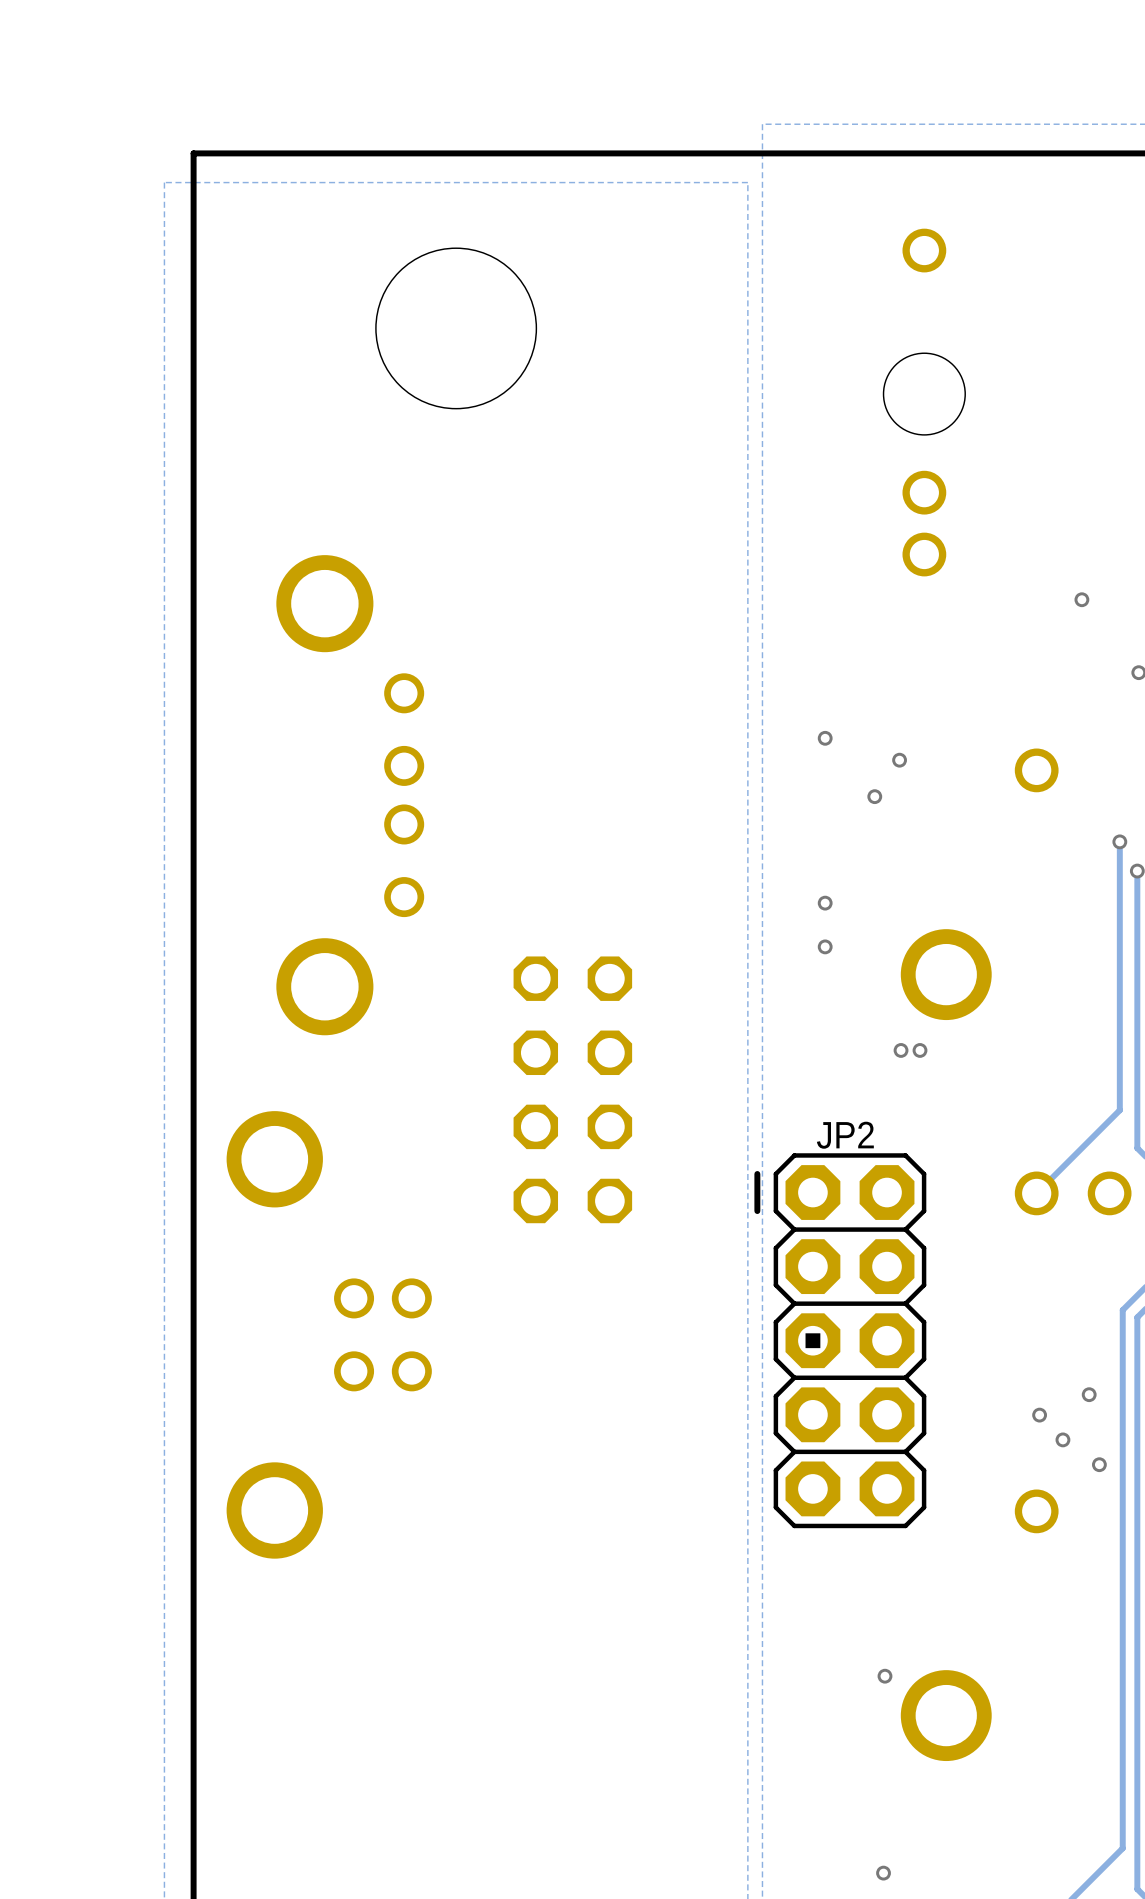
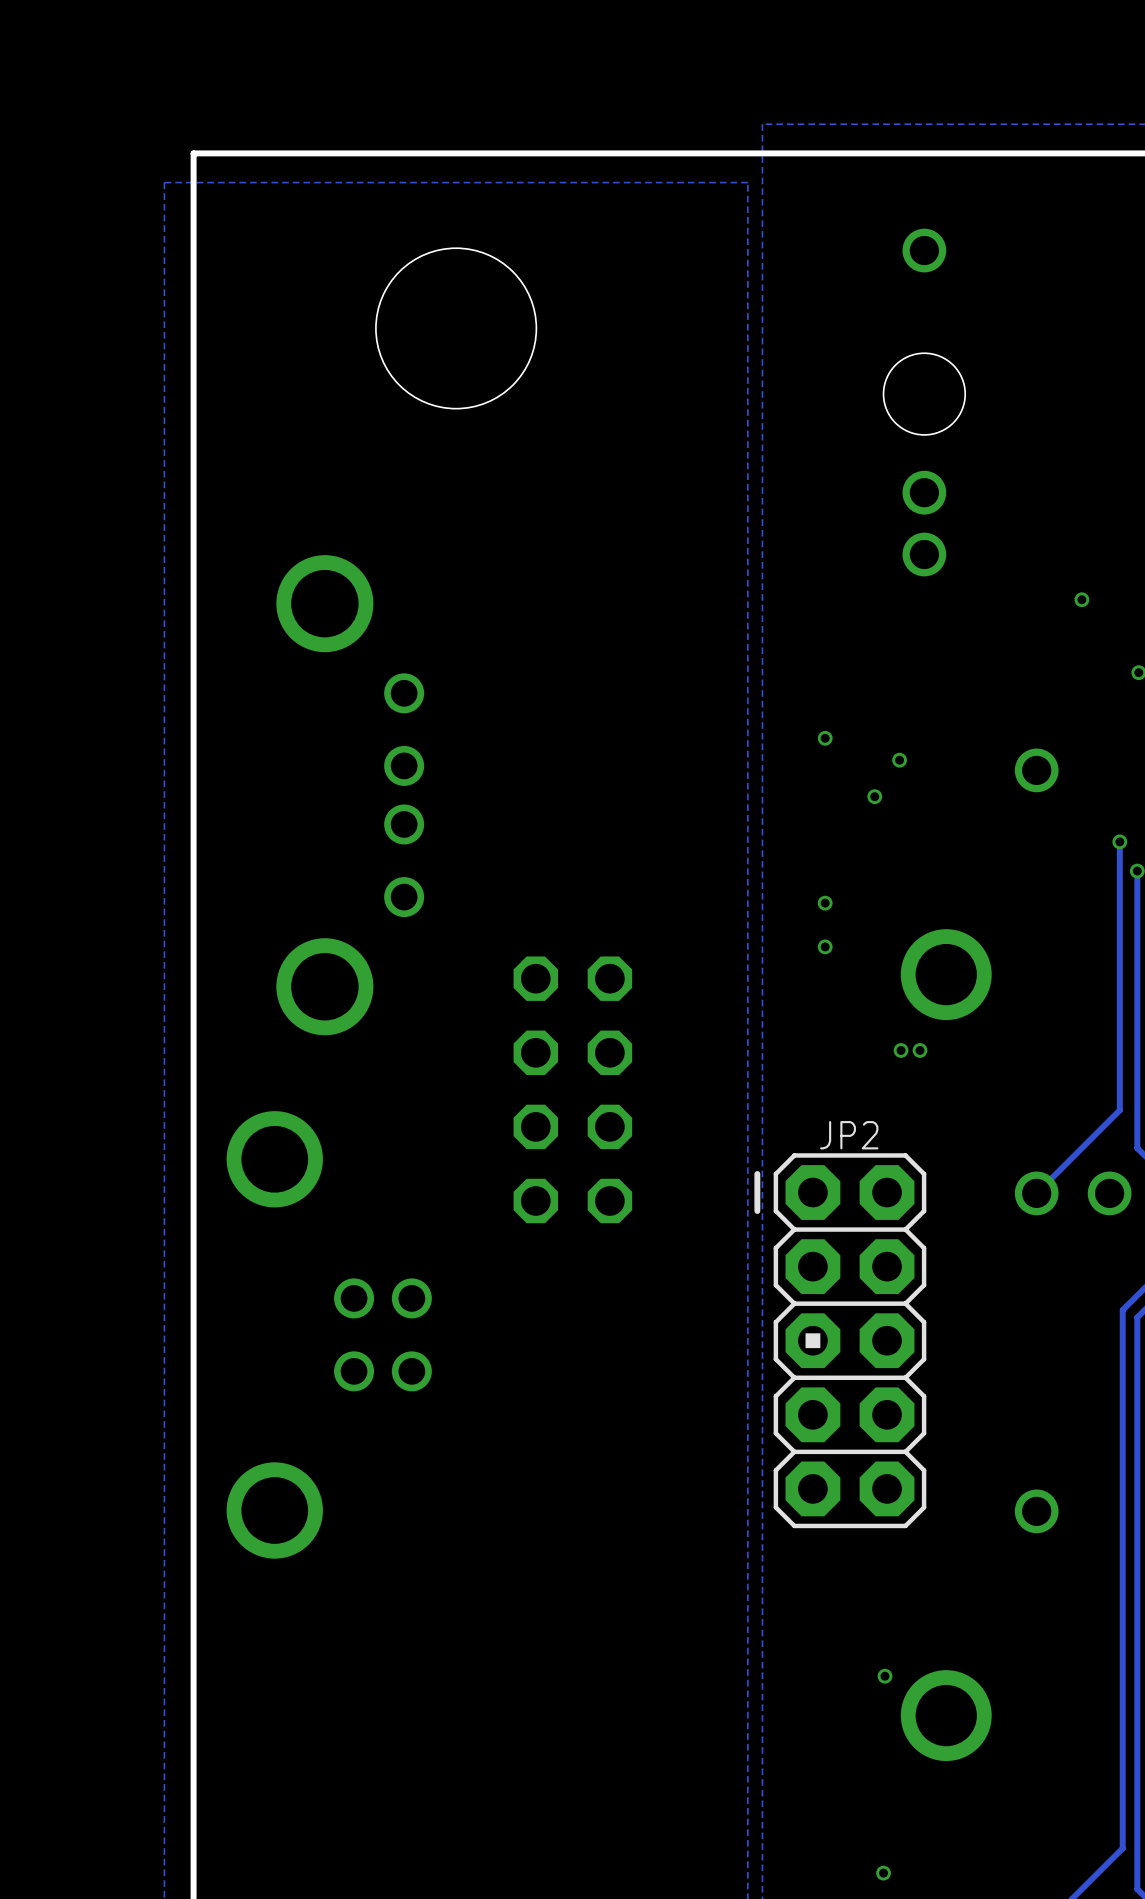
via: (1089, 1394) -> none
via: (1039, 1415) -> none
via: (1062, 1439) -> none
via: (1099, 1464) -> none

